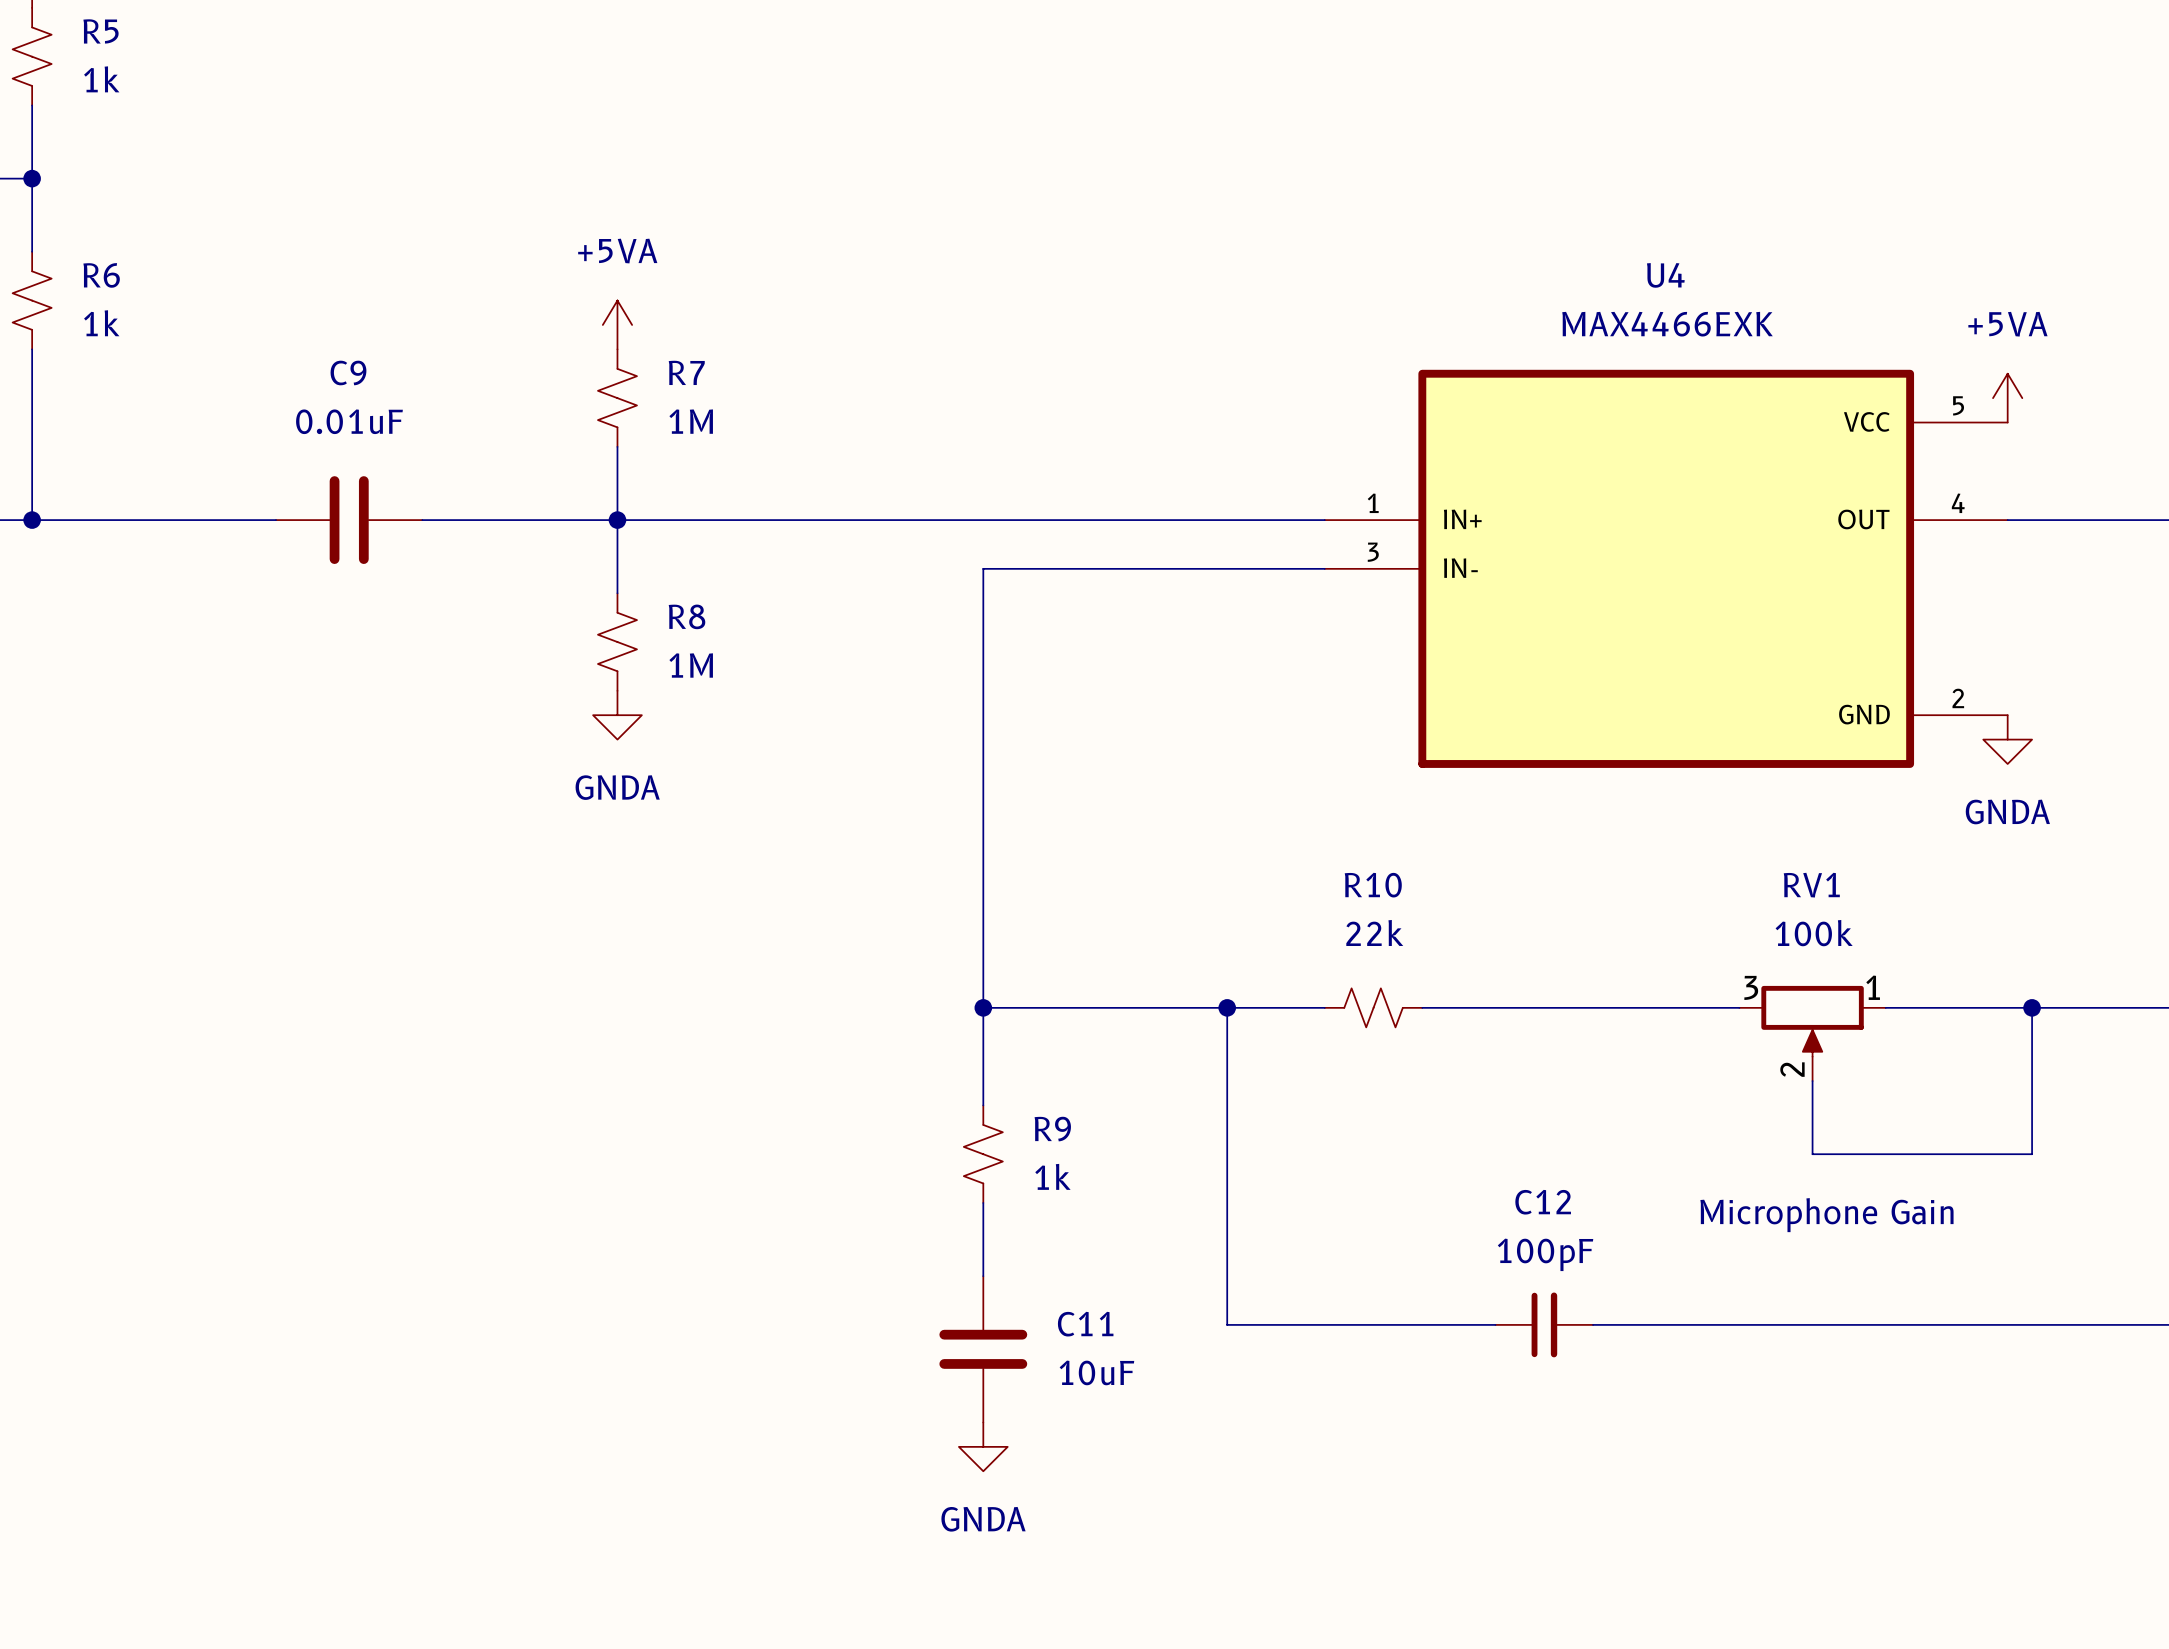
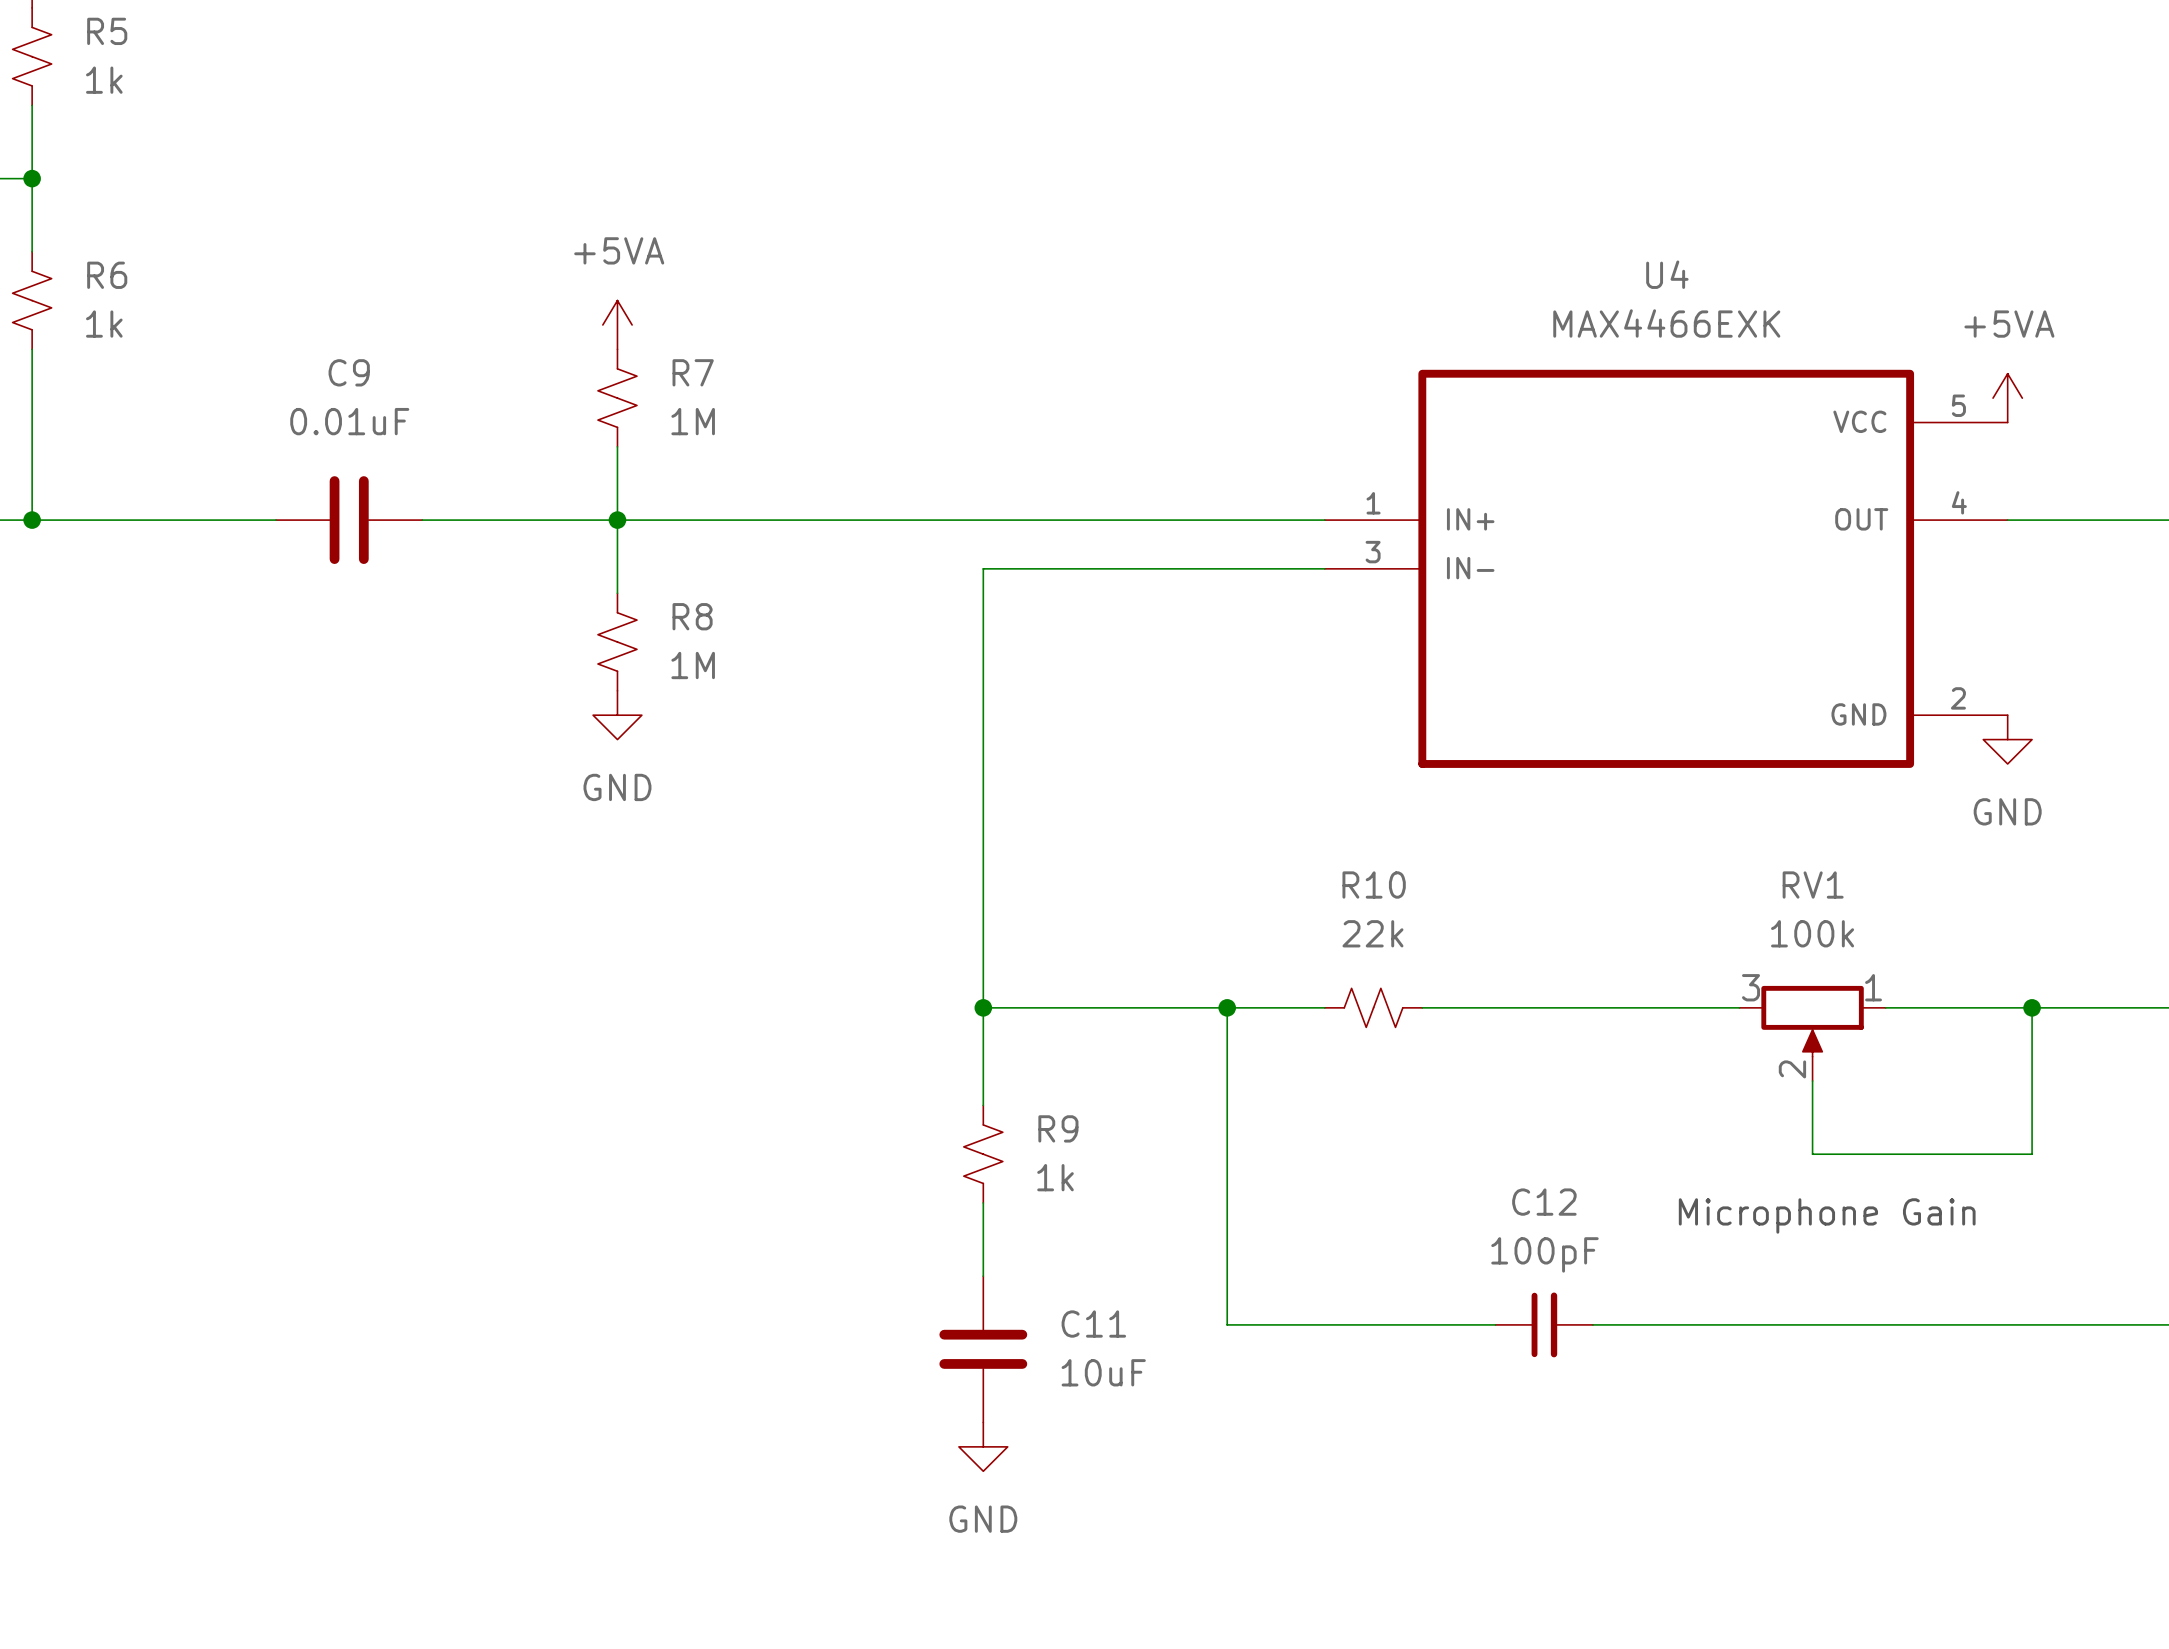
power symbol: GNDA (617, 715) -> GND (617, 715)
power symbol: GNDA (2007, 739) -> GND (2007, 739)
power symbol: GNDA (983, 1446) -> GND (983, 1446)

